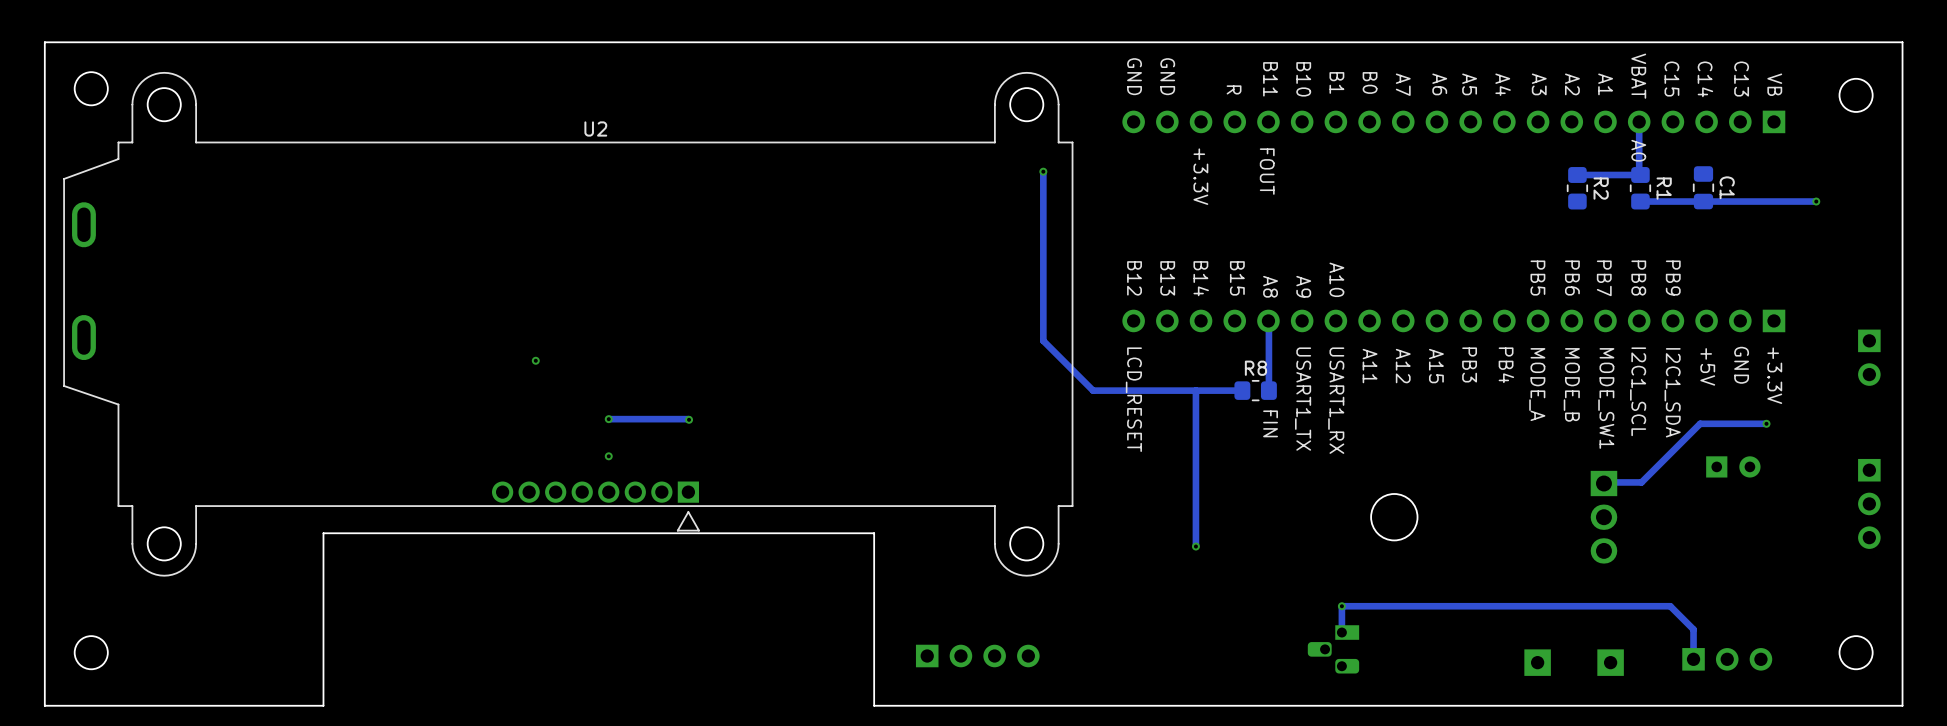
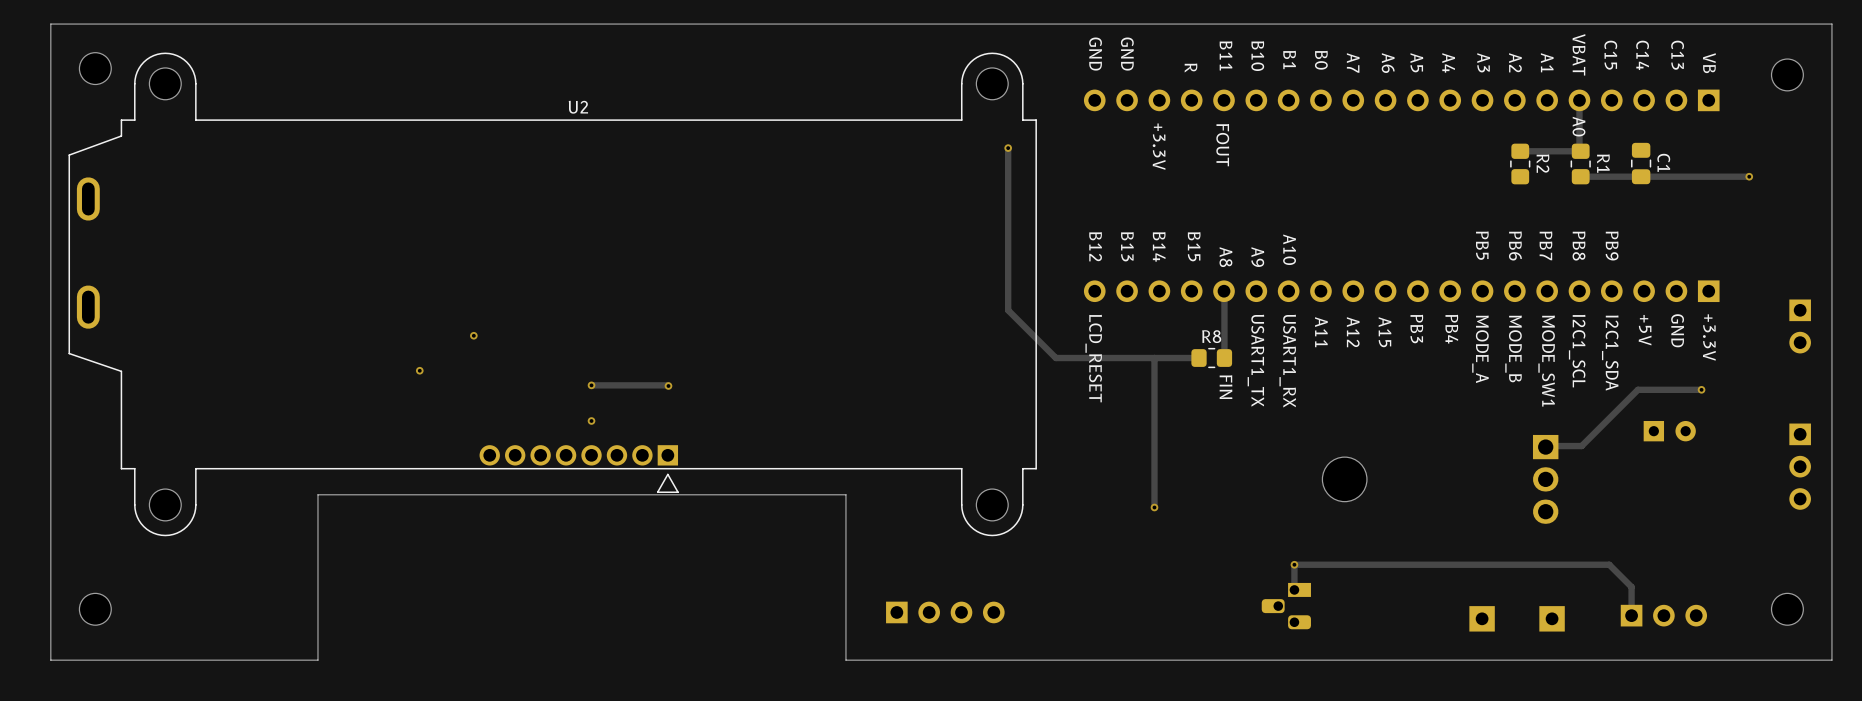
via position: (535, 360) -> (473, 335)
via: none -> (419, 370)

